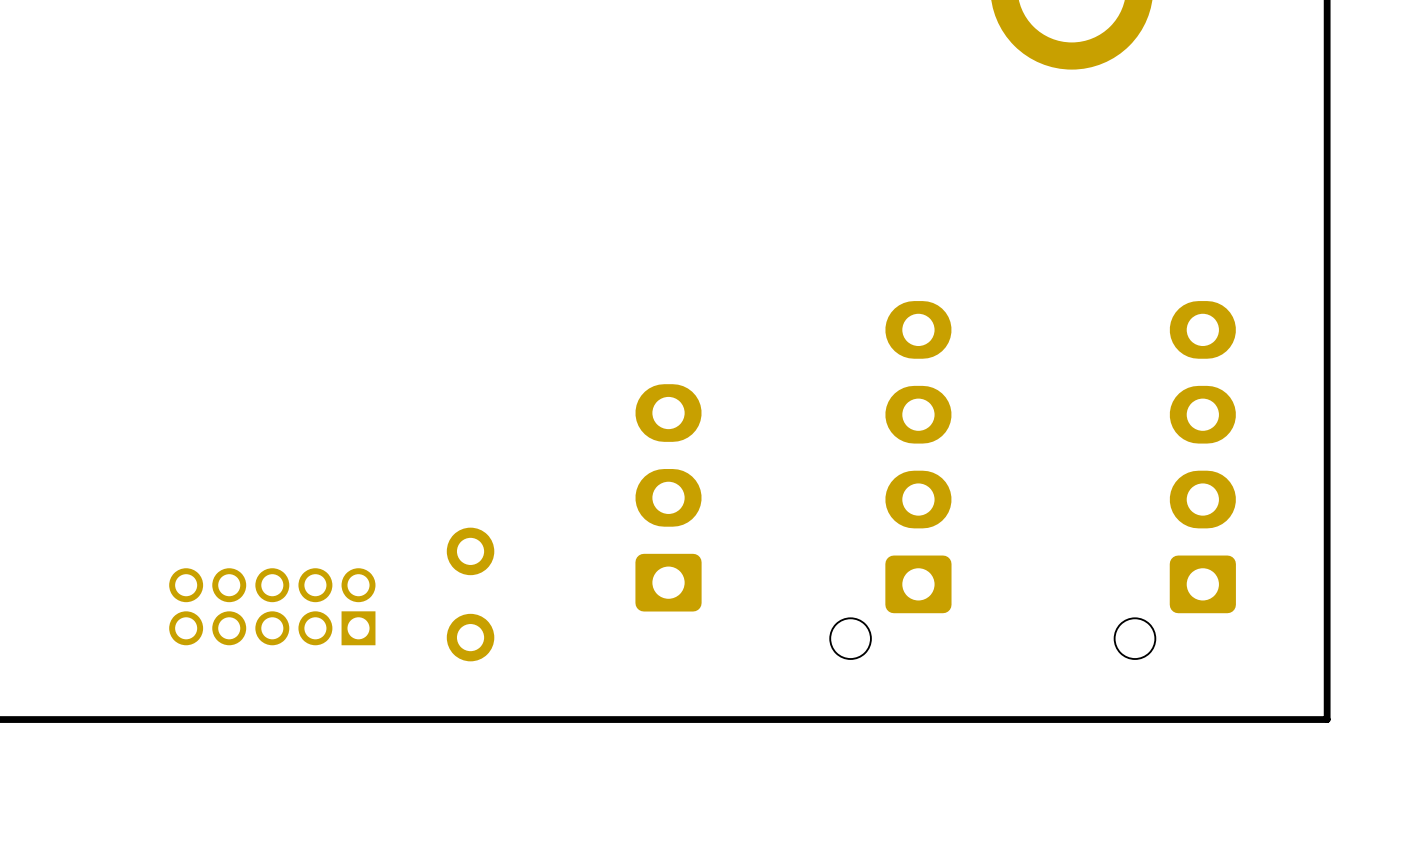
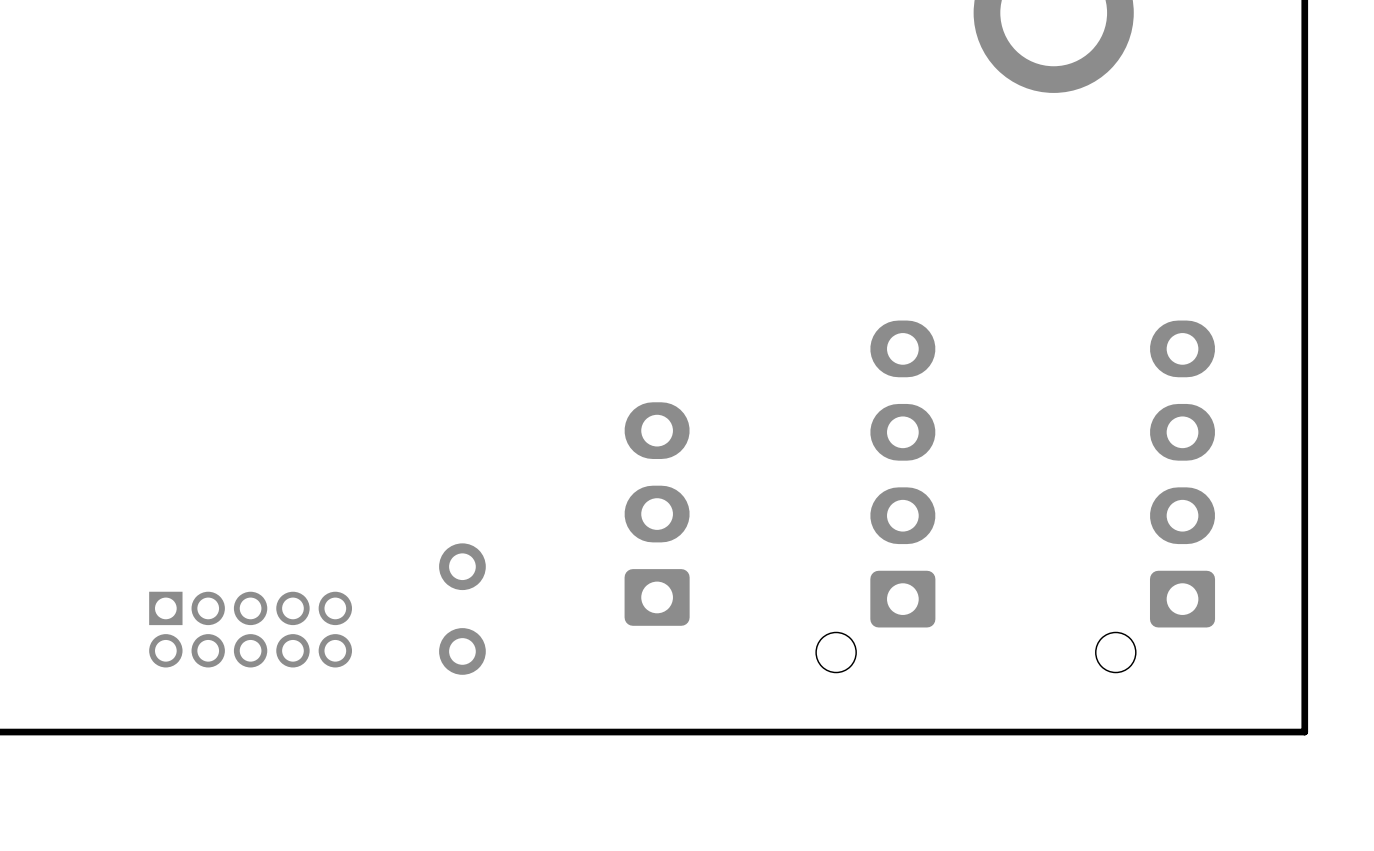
part rotation: 0° (272, 606) -> 180° (250, 629)

